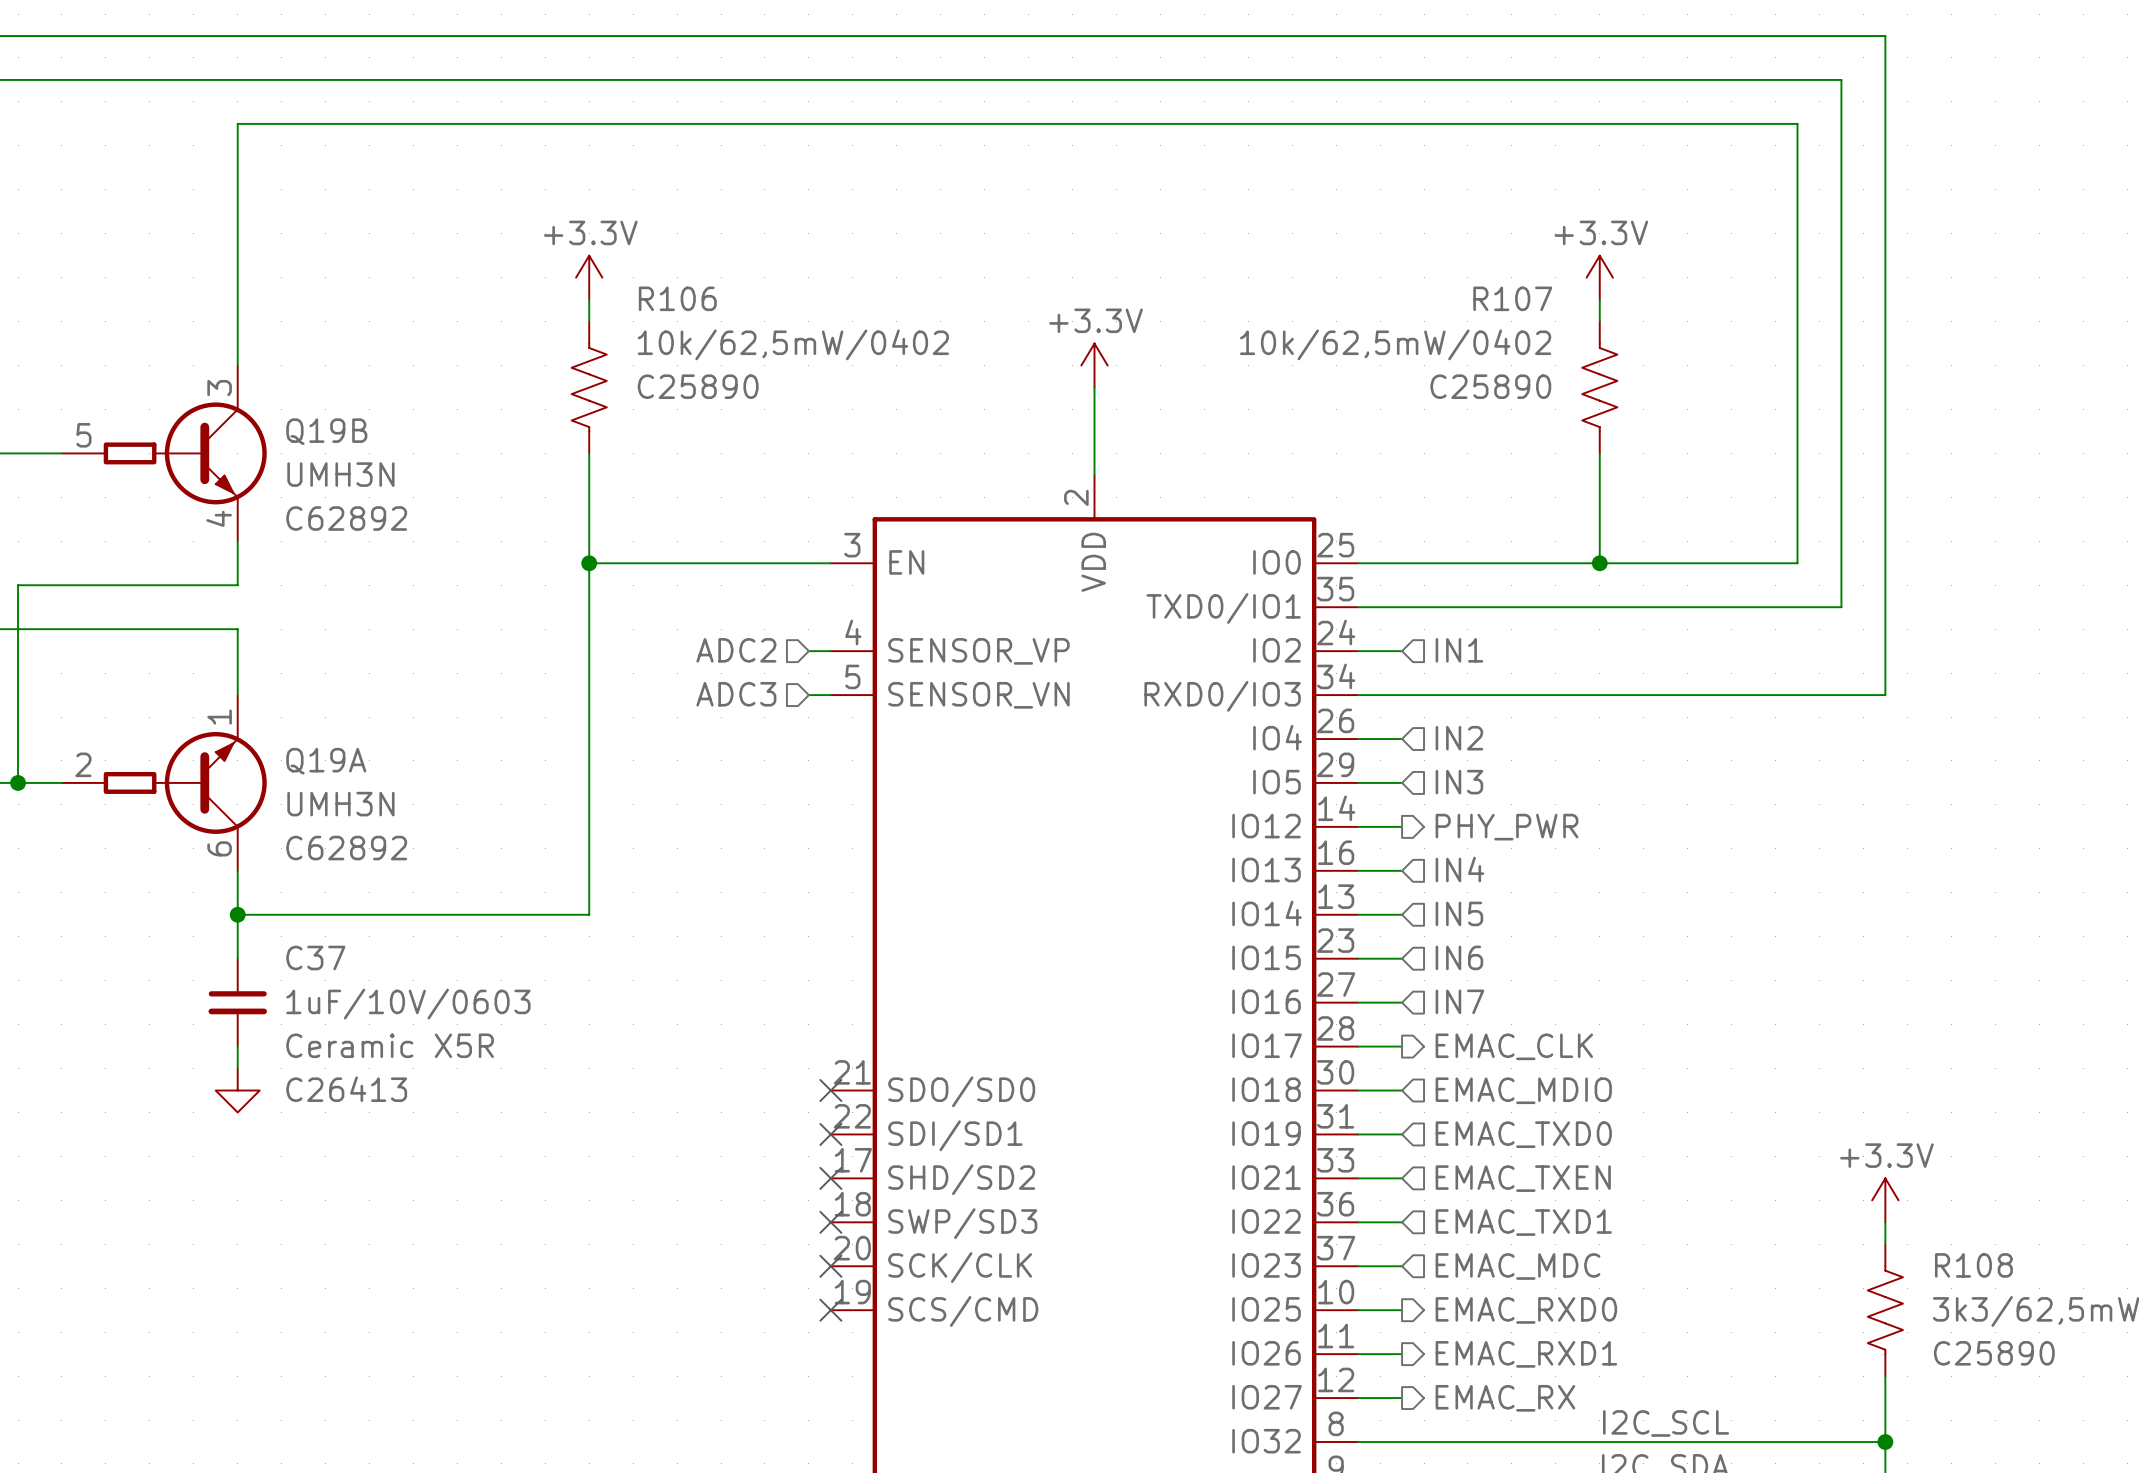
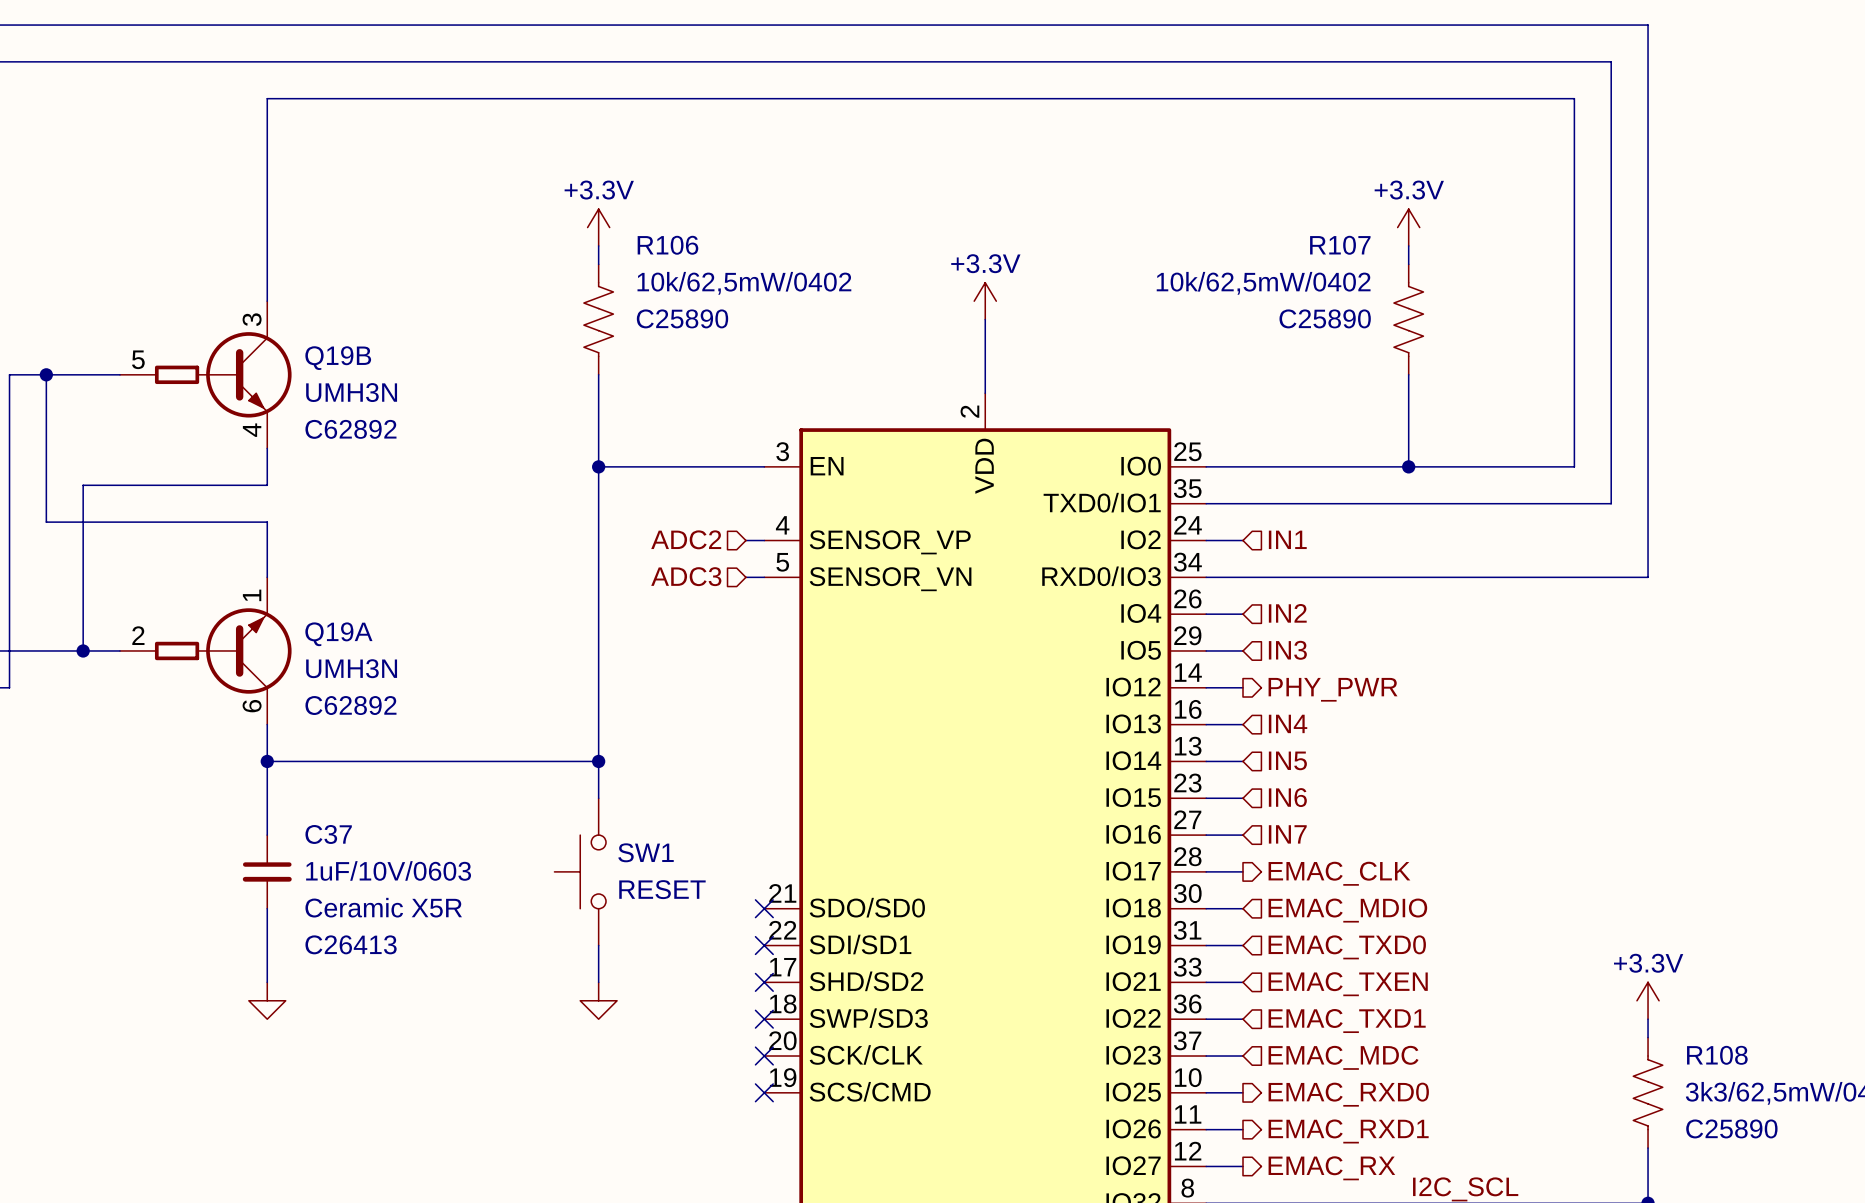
power symbol position: +3.3V (589, 277) -> +3.3V (598, 227)
wire: (589, 299) (589, 321) -> (598, 245) (598, 264)
R106 position: (589, 387) -> (598, 319)
wire: (589, 453) (589, 914) -> (598, 761) (561, 761)
wire: none -> (598, 374) (598, 798)
wire: (589, 563) (633, 563) -> none
junction position: (589, 563) -> (598, 466)
junction: none -> (598, 761)
C37 position: (237, 1002) -> (267, 871)
SW1: none -> RESET (580, 871)
wire: none -> (267, 908) (267, 982)
power symbol position: (237, 1090) -> (267, 1000)
wire: none -> (598, 945) (598, 982)
power symbol: none -> (598, 1000)

